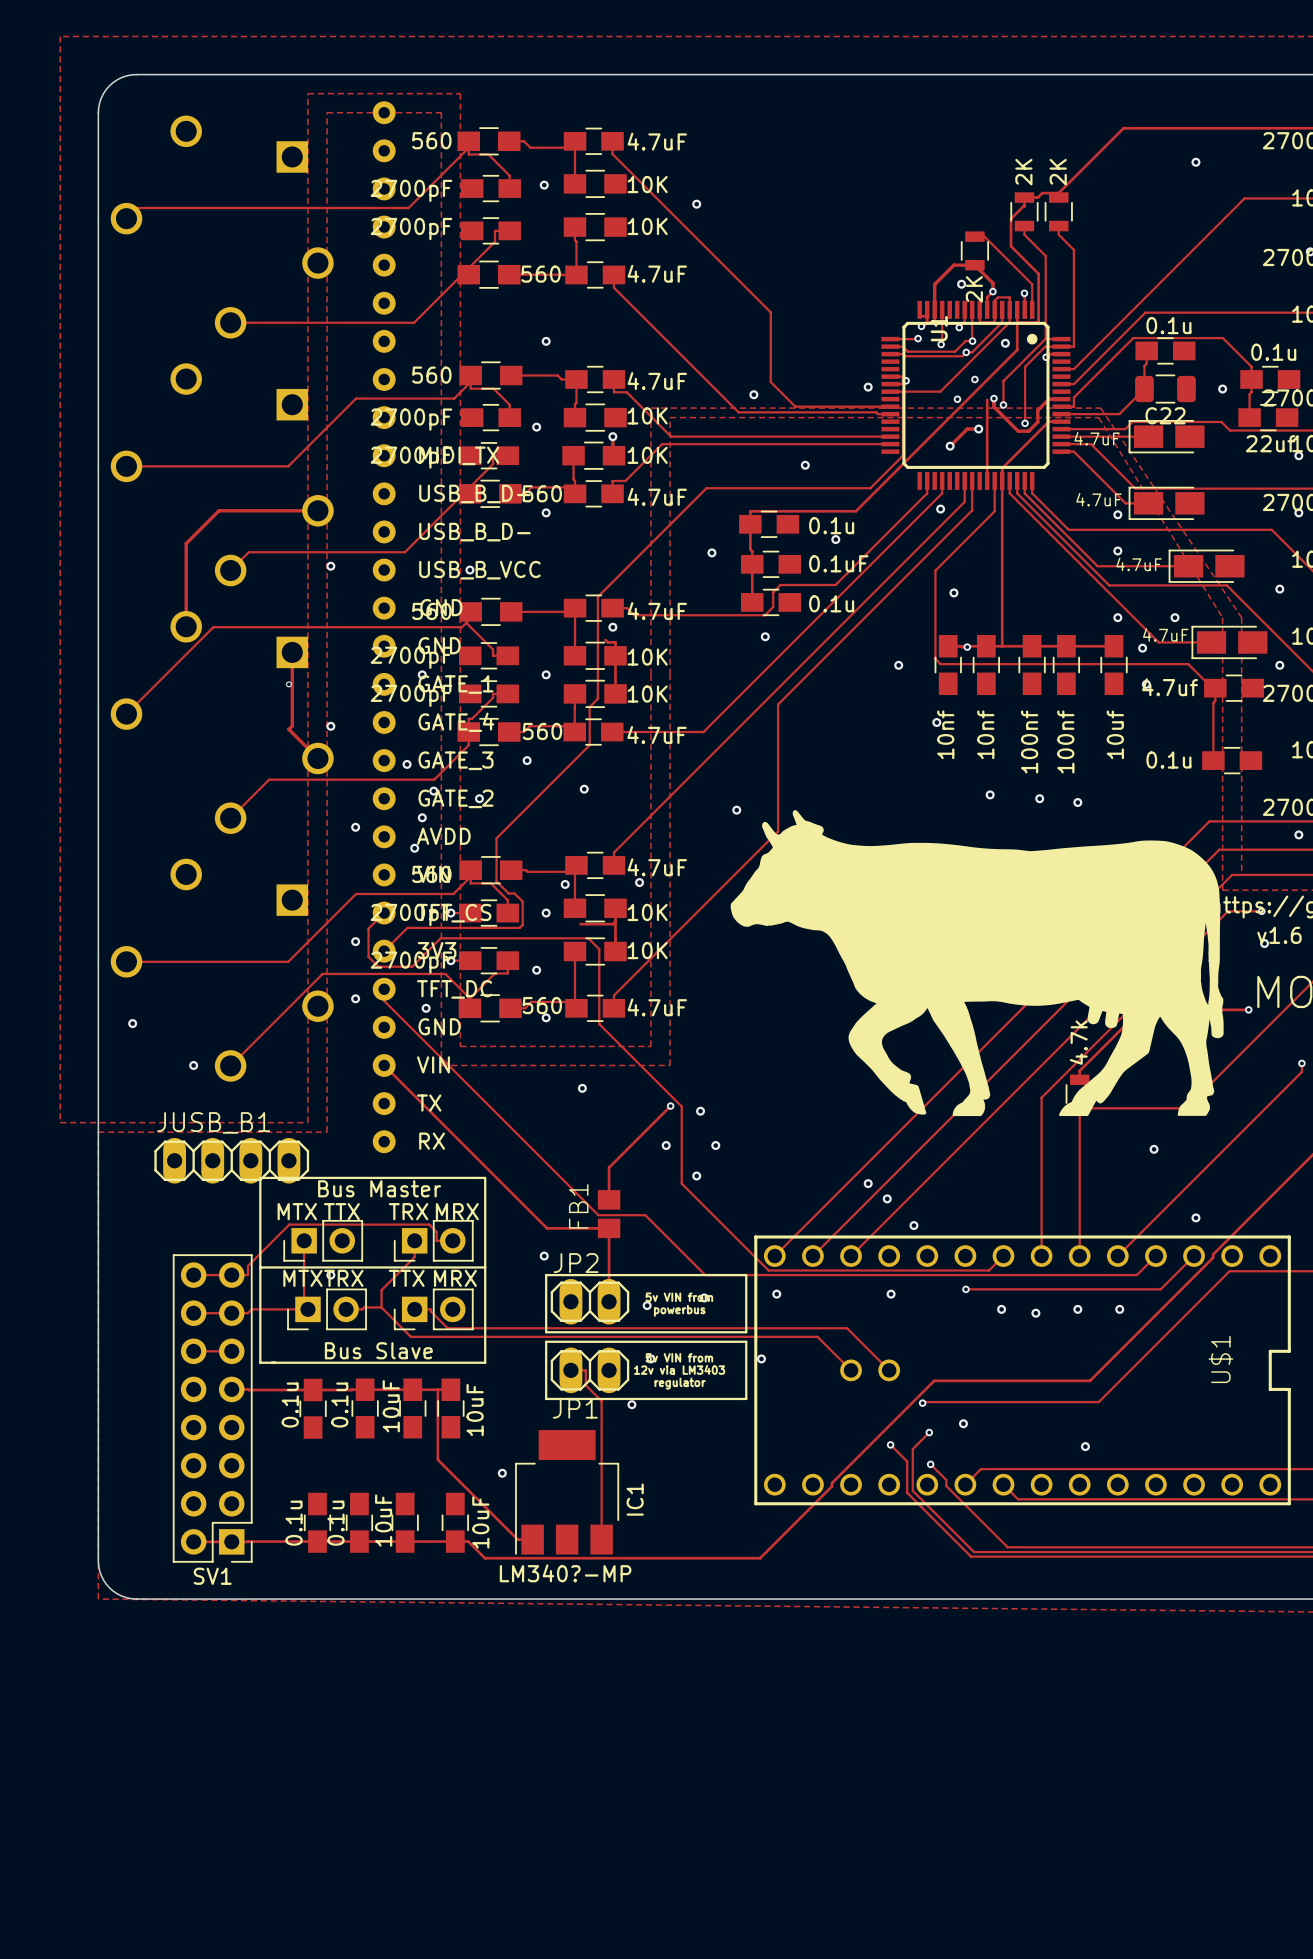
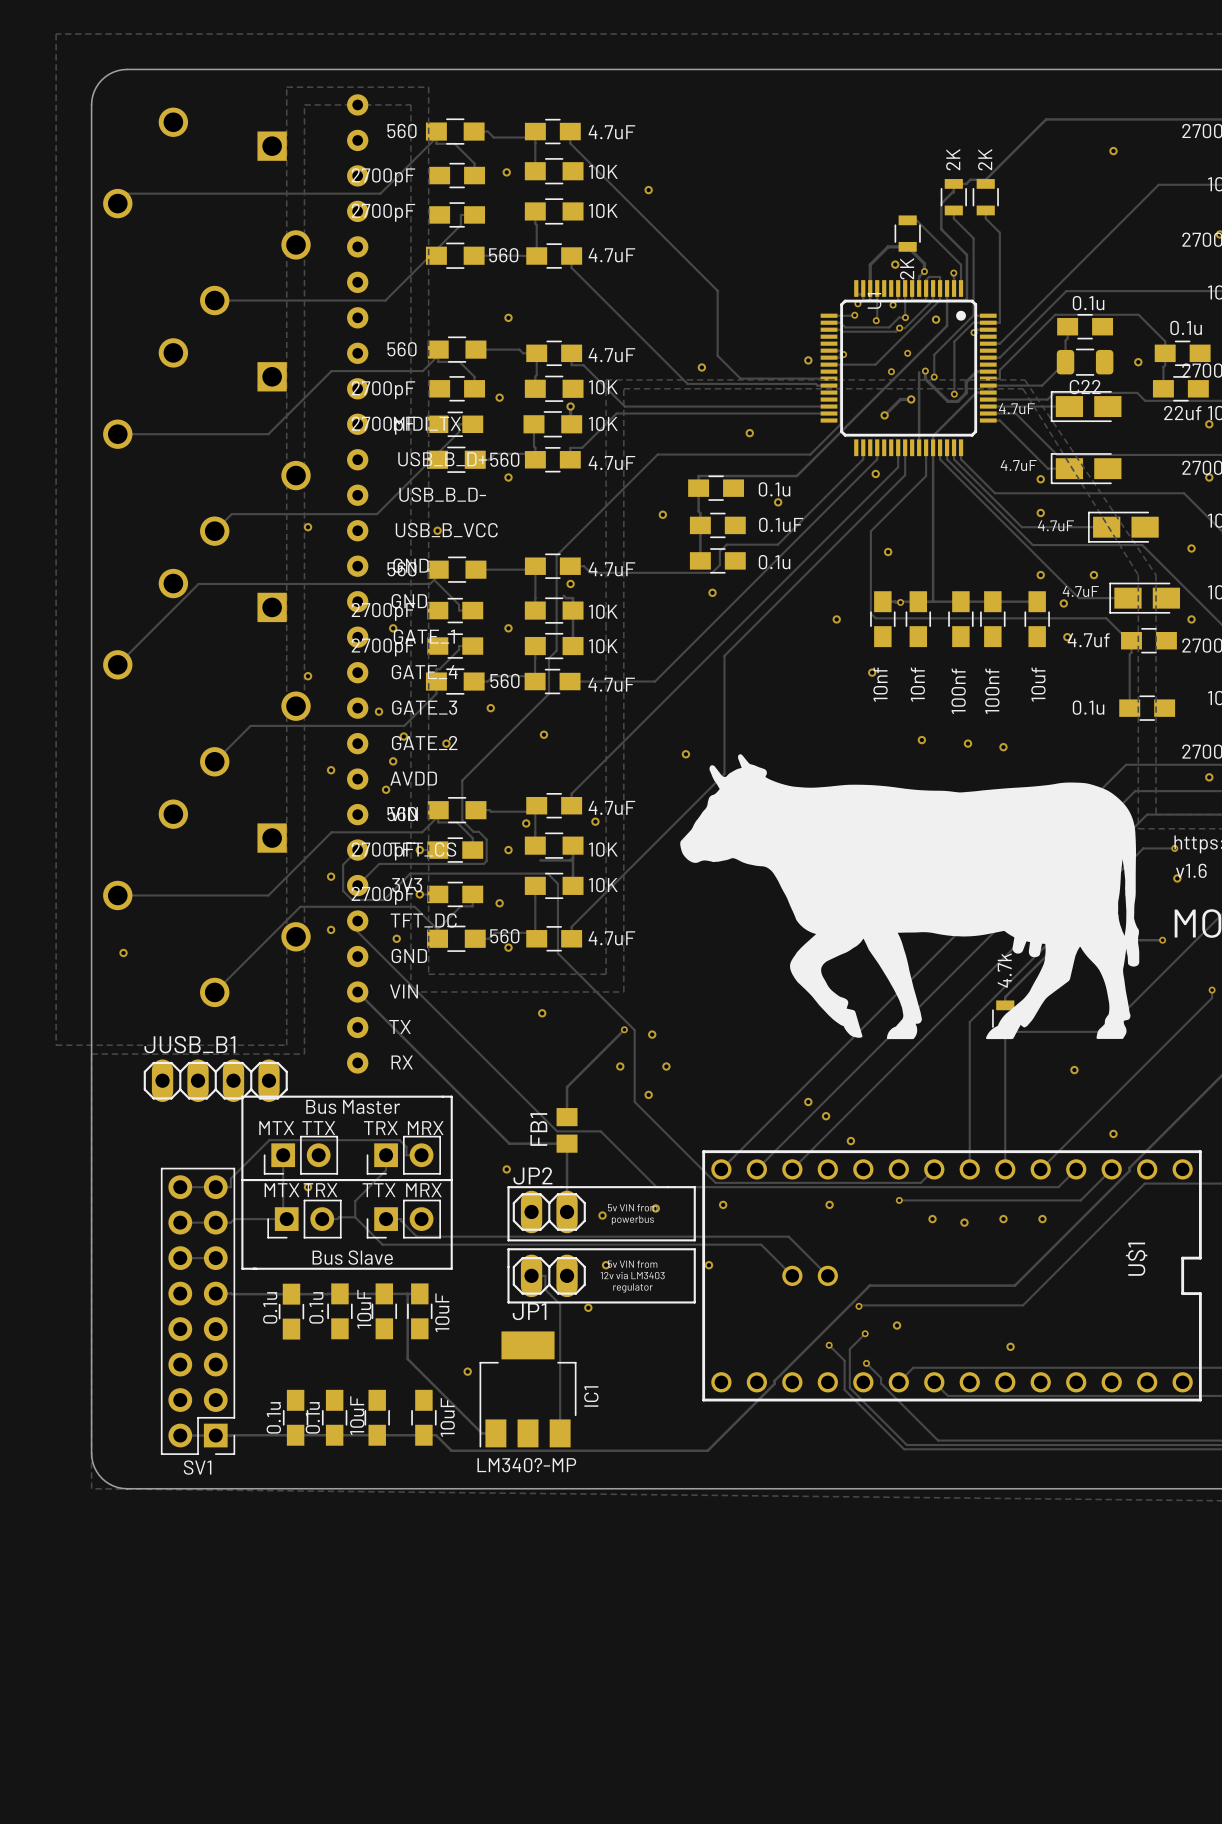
track: (317, 510) (219, 510) (186, 543) (186, 626) -> none
track: (292, 652) (292, 726) (288, 729) (317, 758) -> none
via: (288, 684) -> none
via: (193, 1065) -> none

